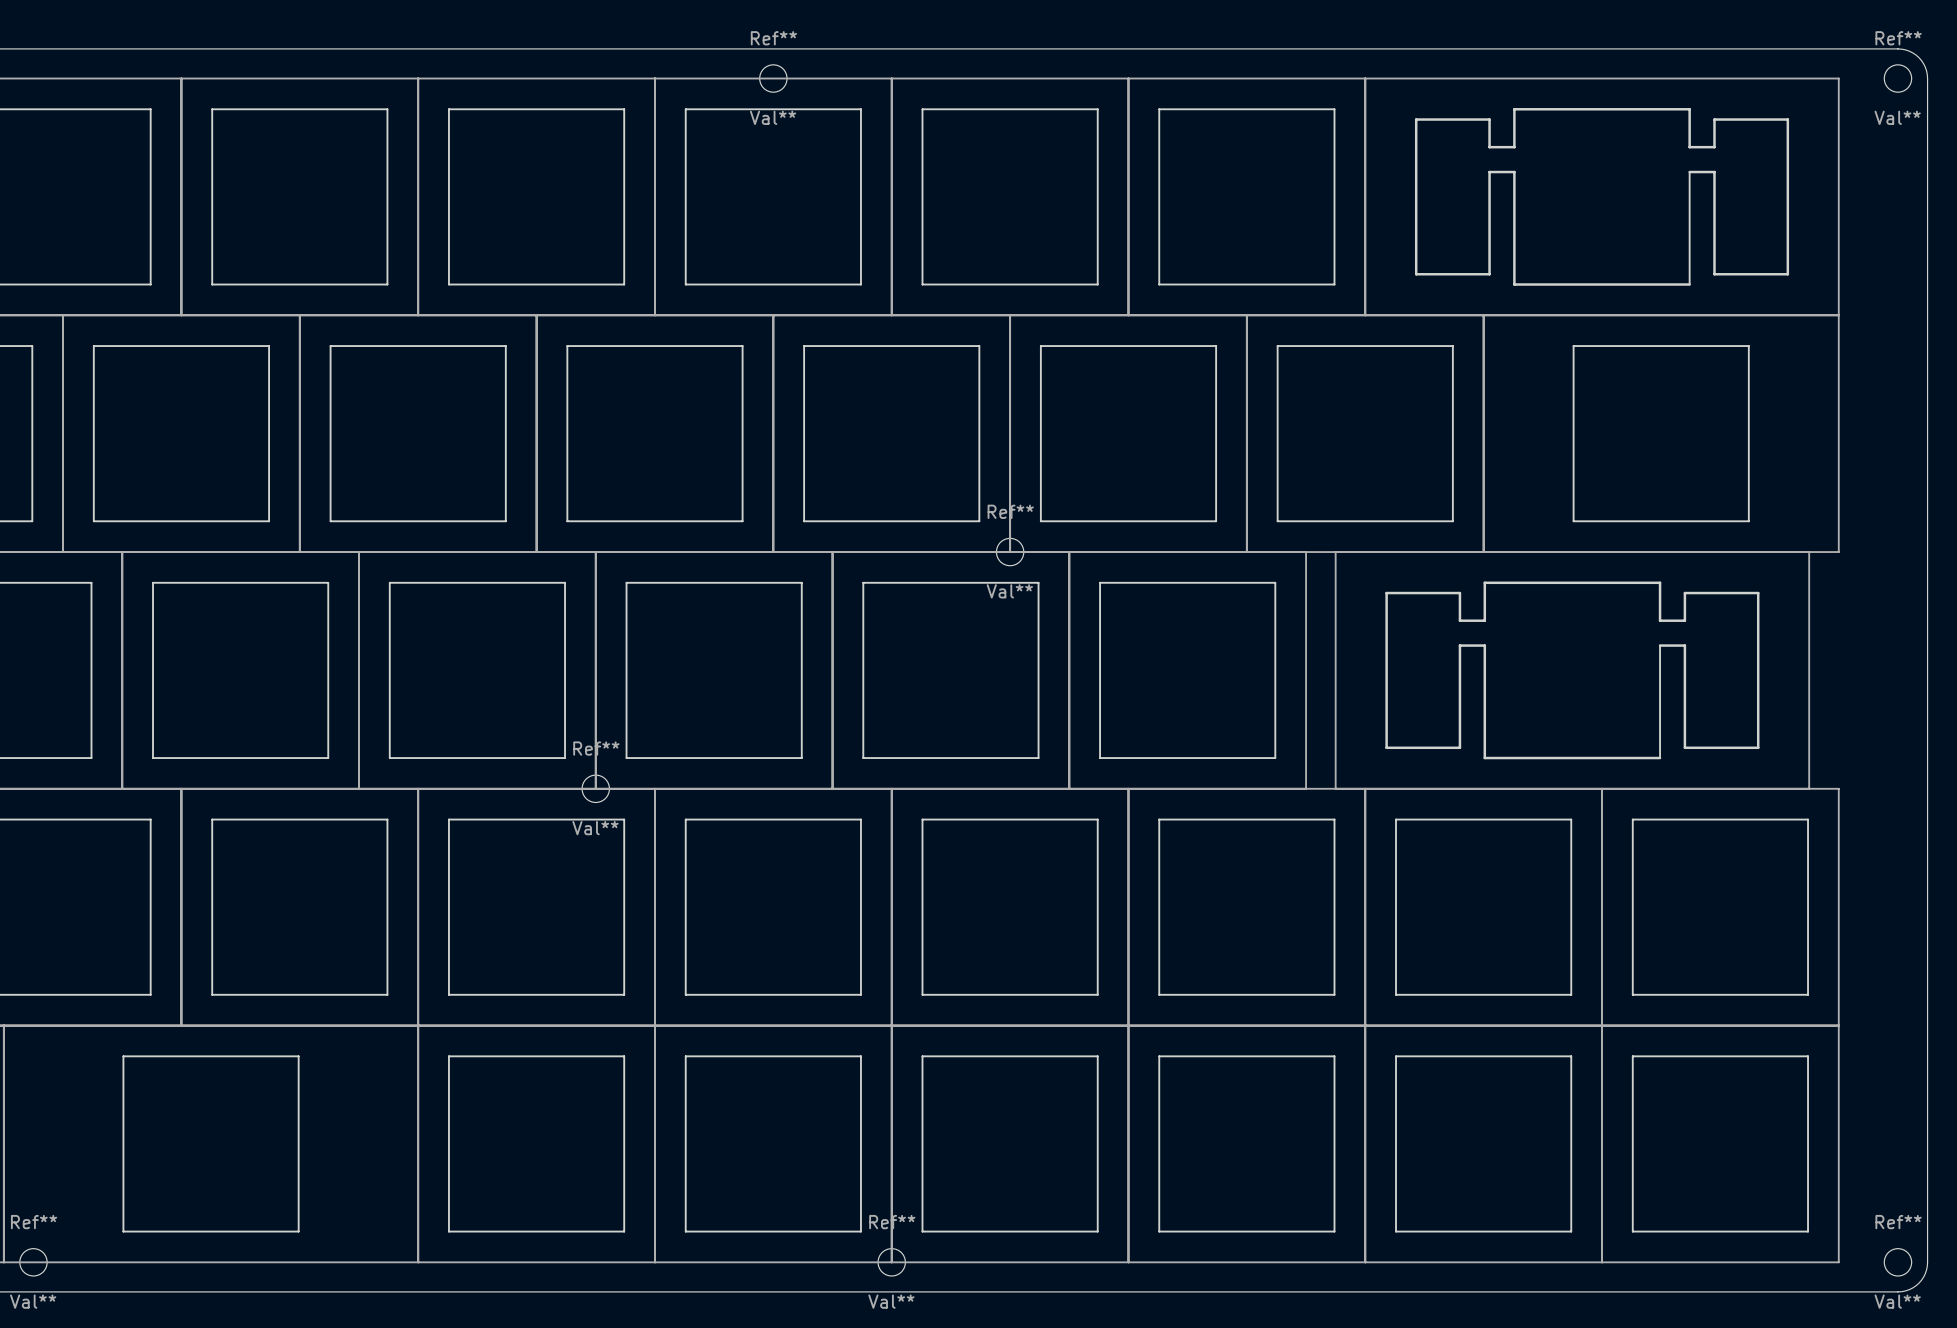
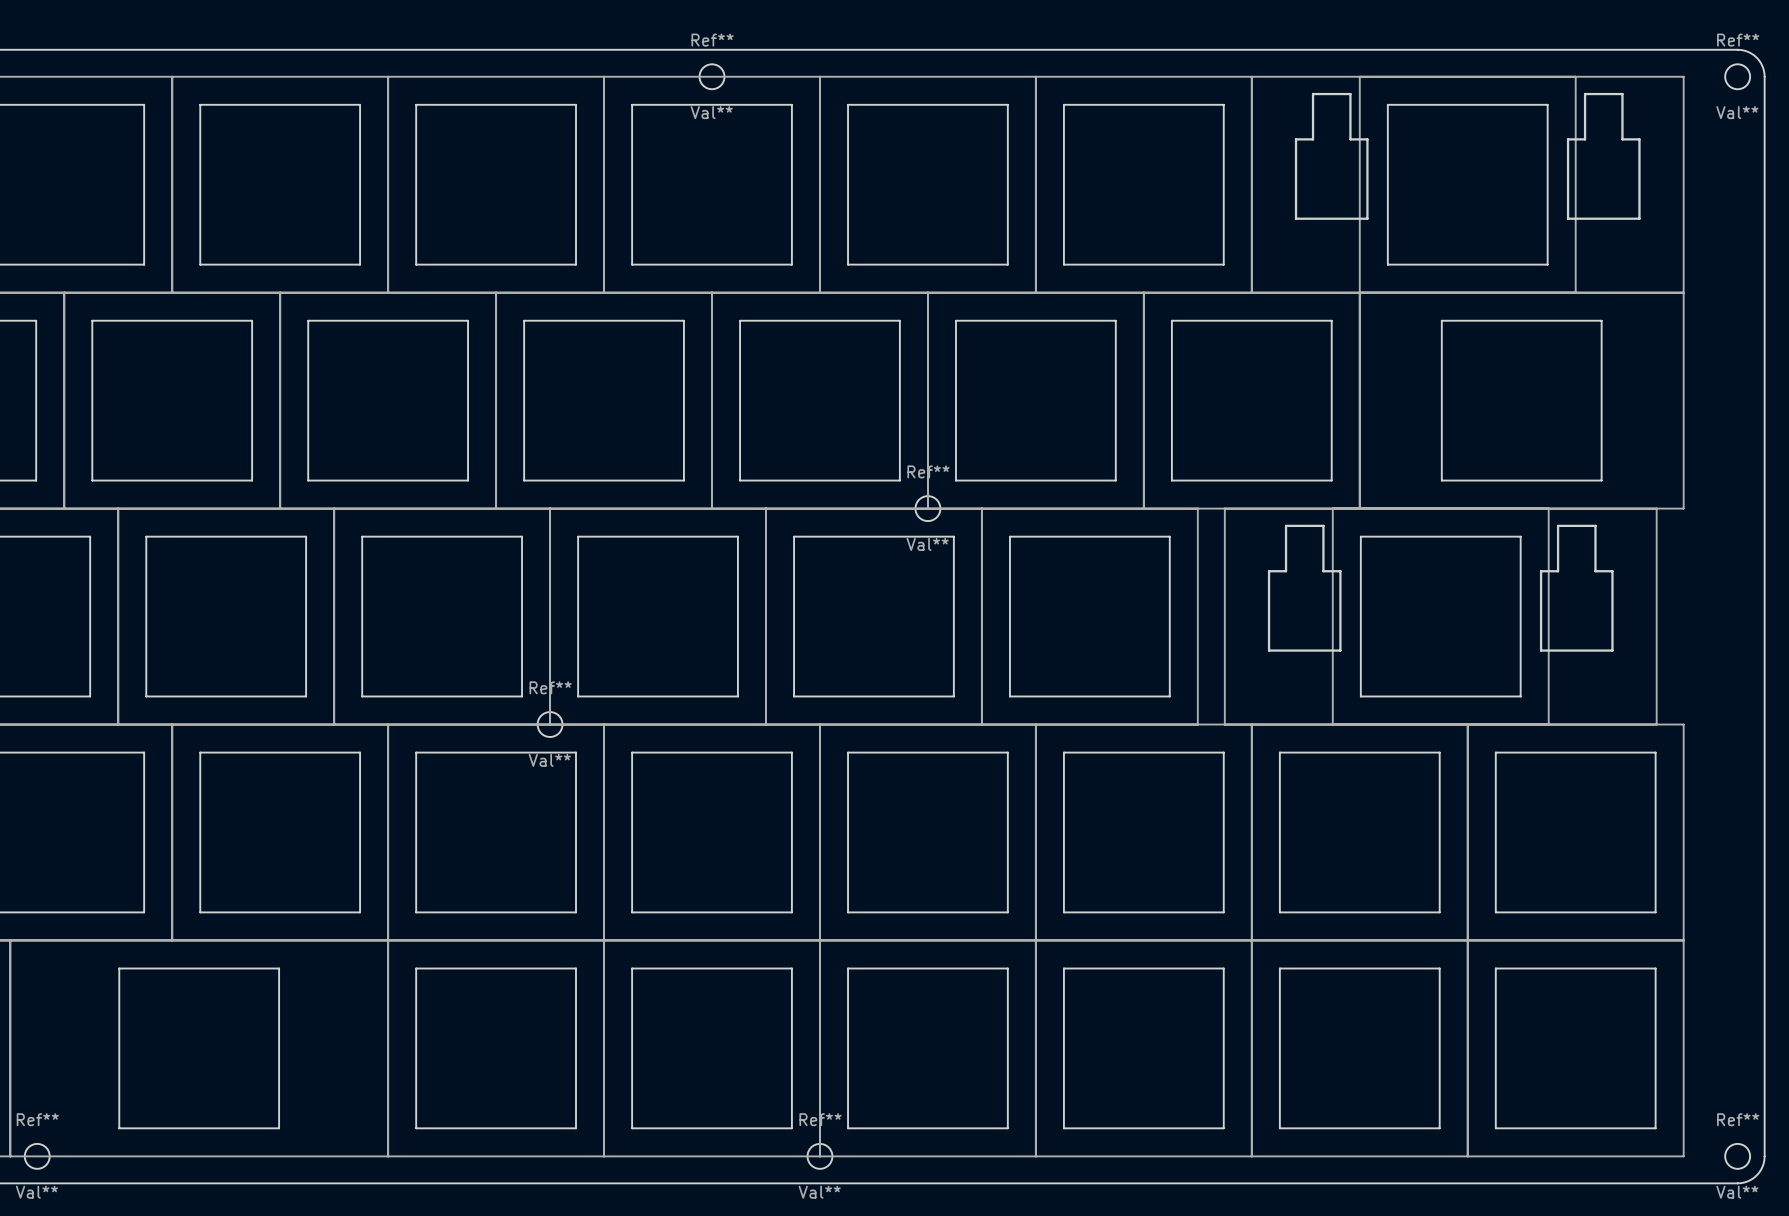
drawing: [1364, 77, 1840, 317] -> none
drawing: none -> [1250, 75, 1685, 294]
drawing: [1334, 551, 1811, 790] -> none
drawing: none -> [1223, 507, 1658, 726]

